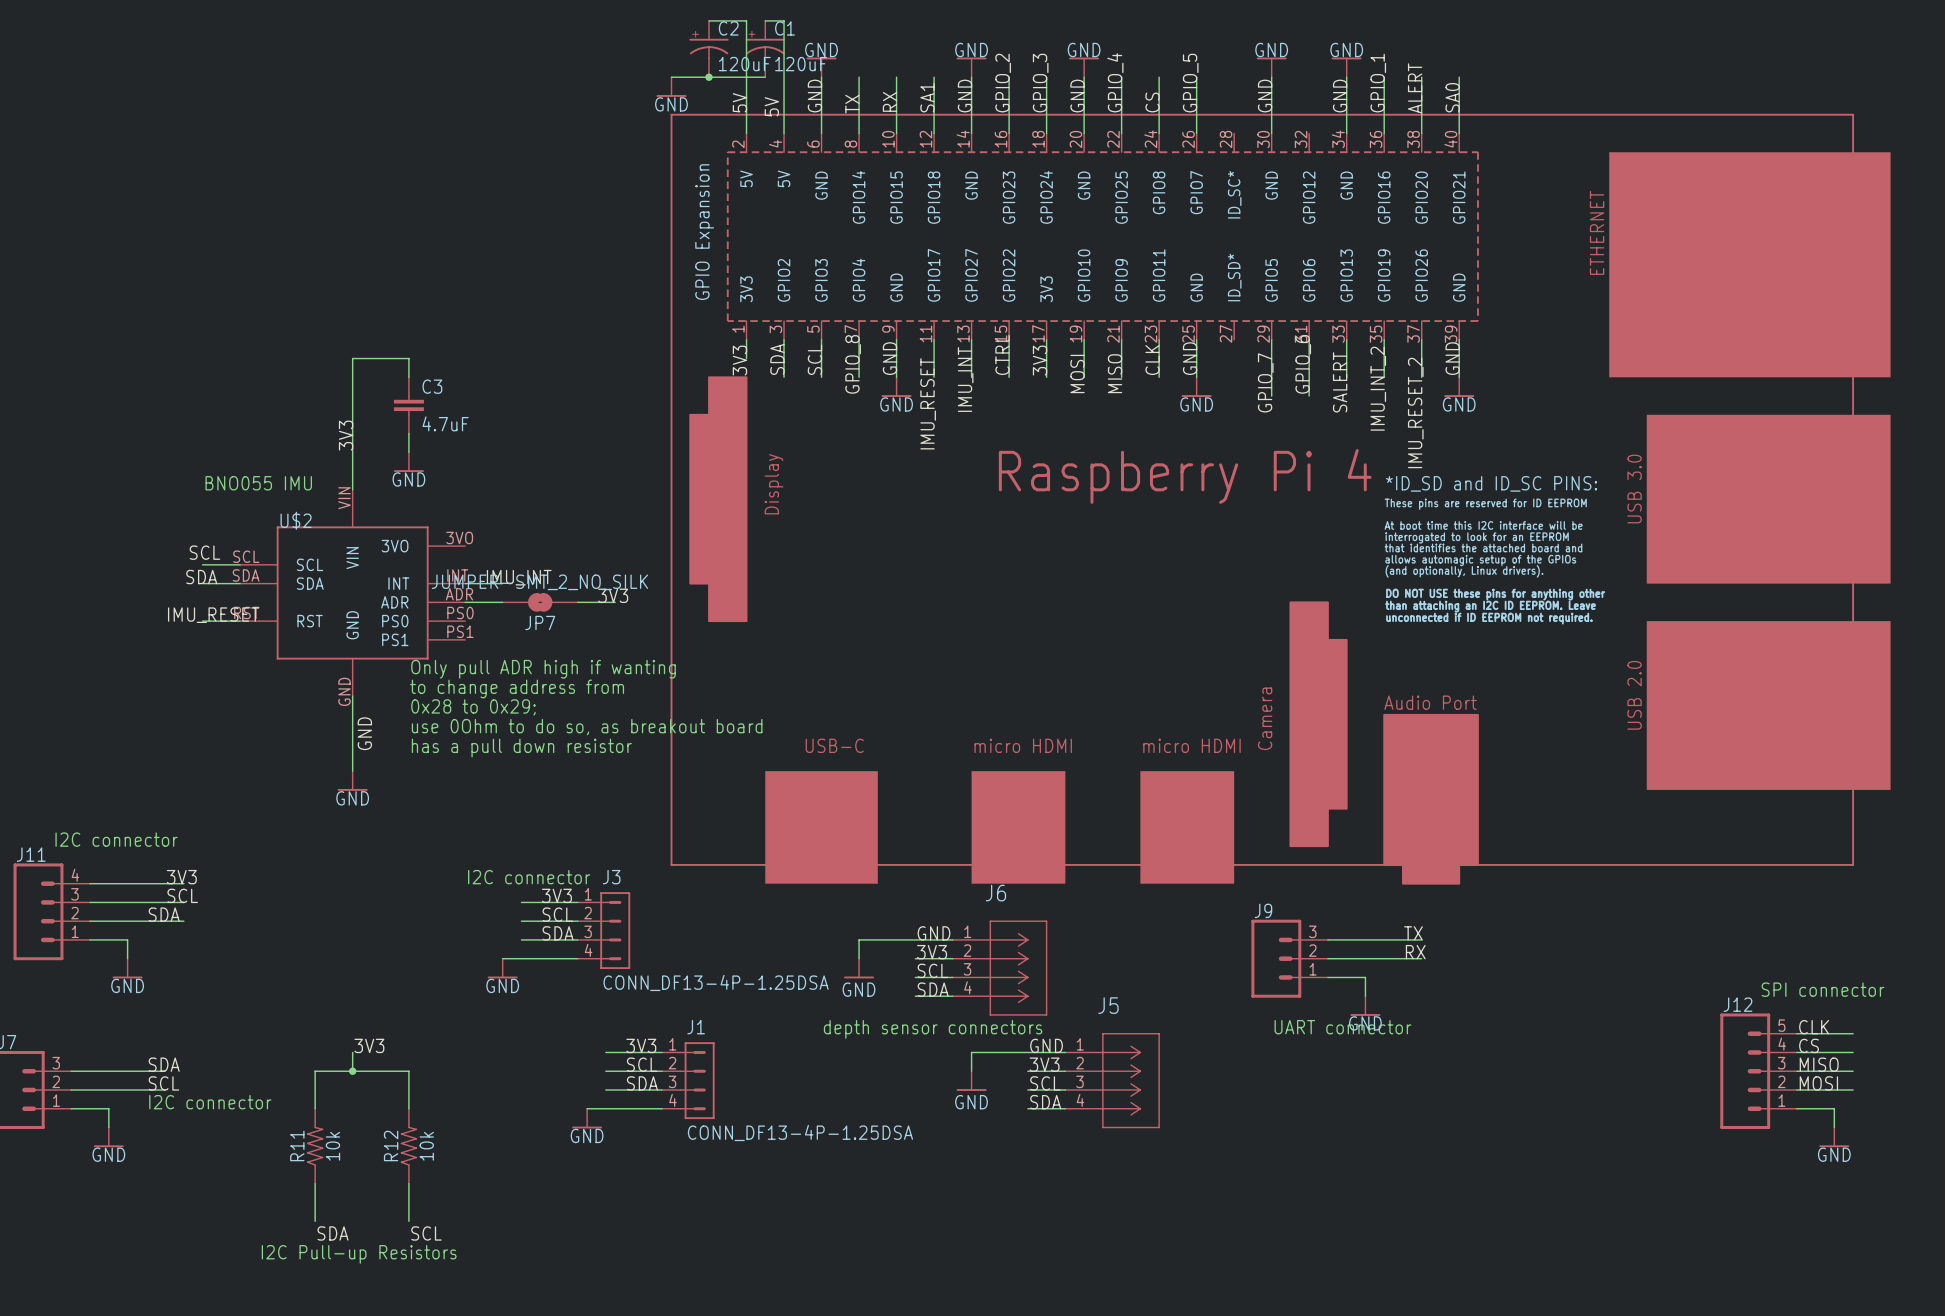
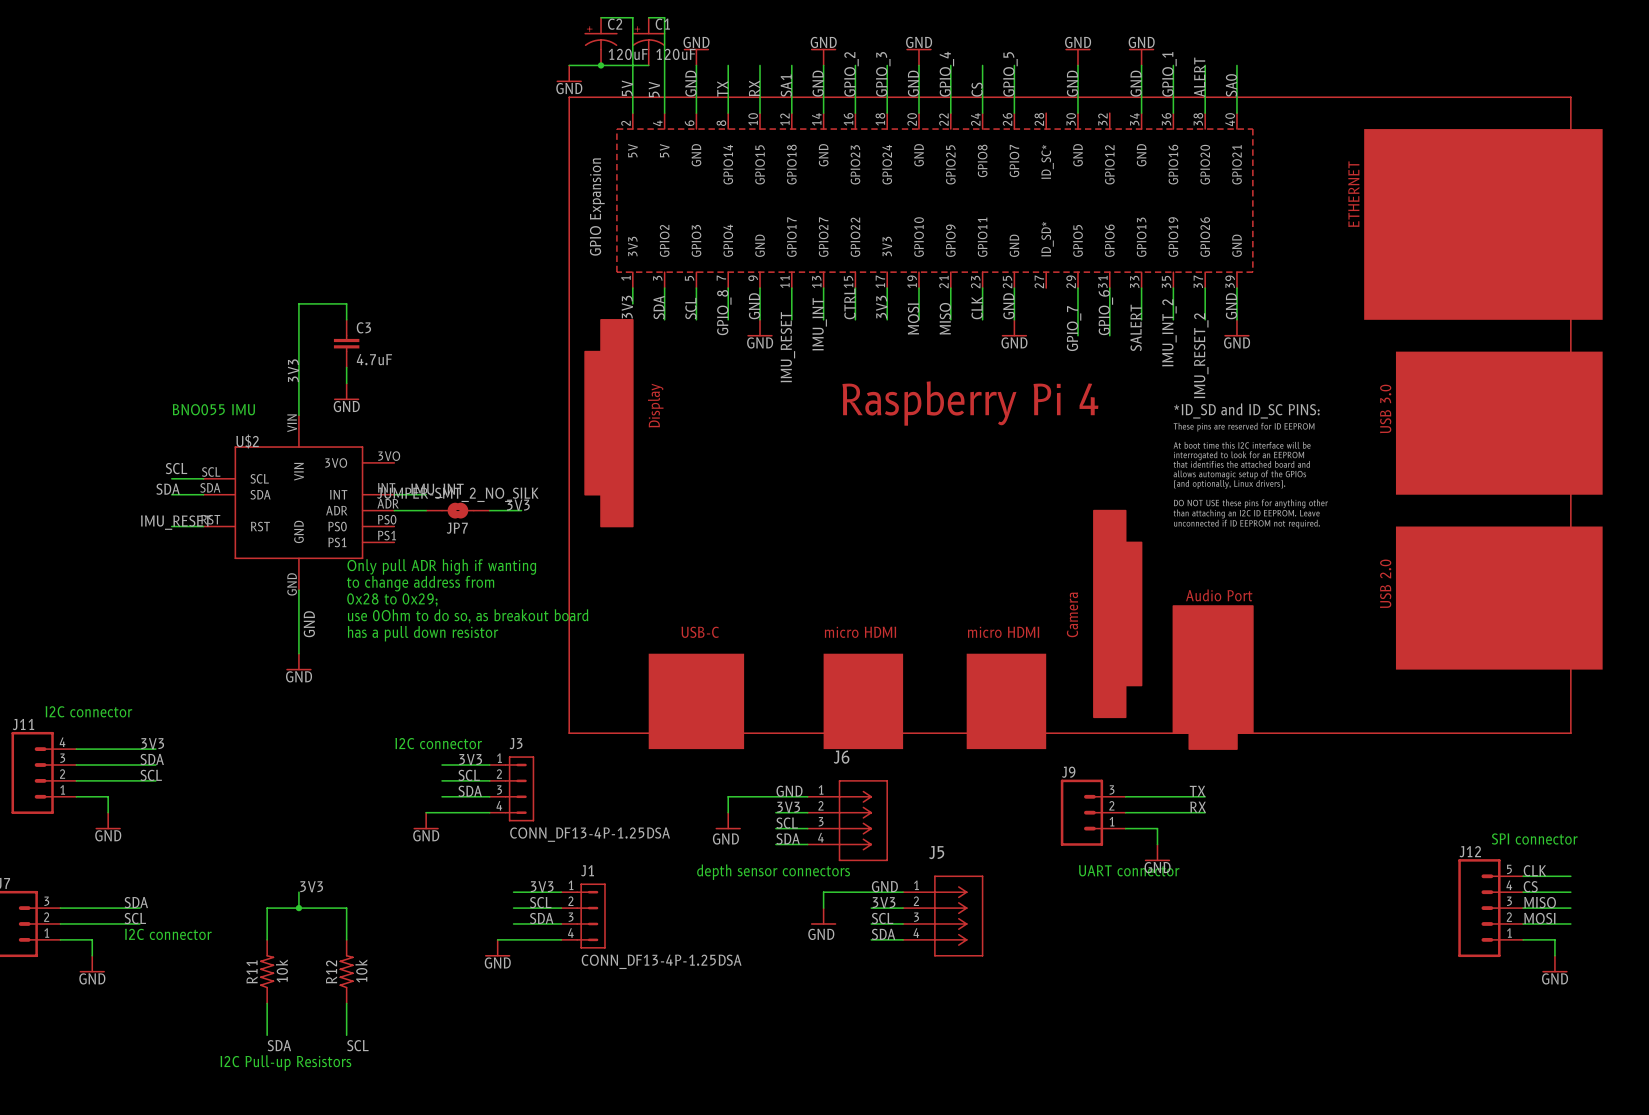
label: SCL (182, 895) -> SDA (152, 759)
label: SDA (164, 914) -> none
label: none -> SCL (151, 775)

